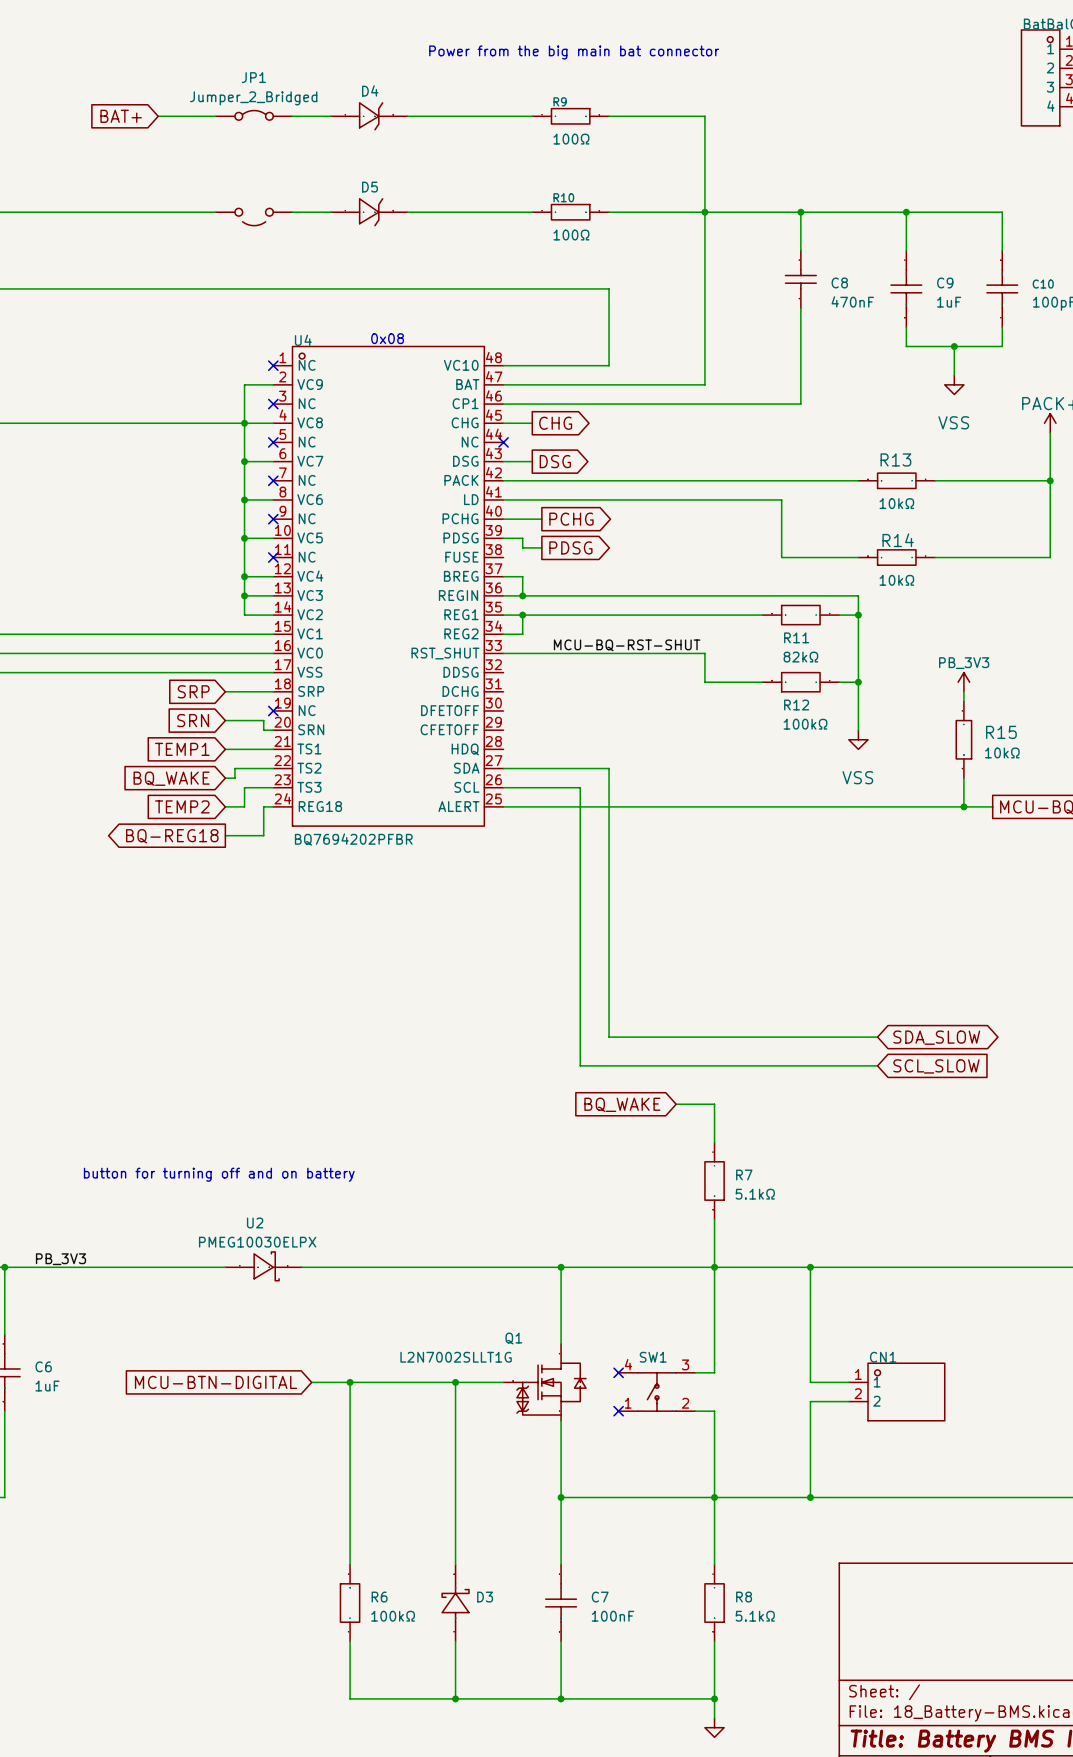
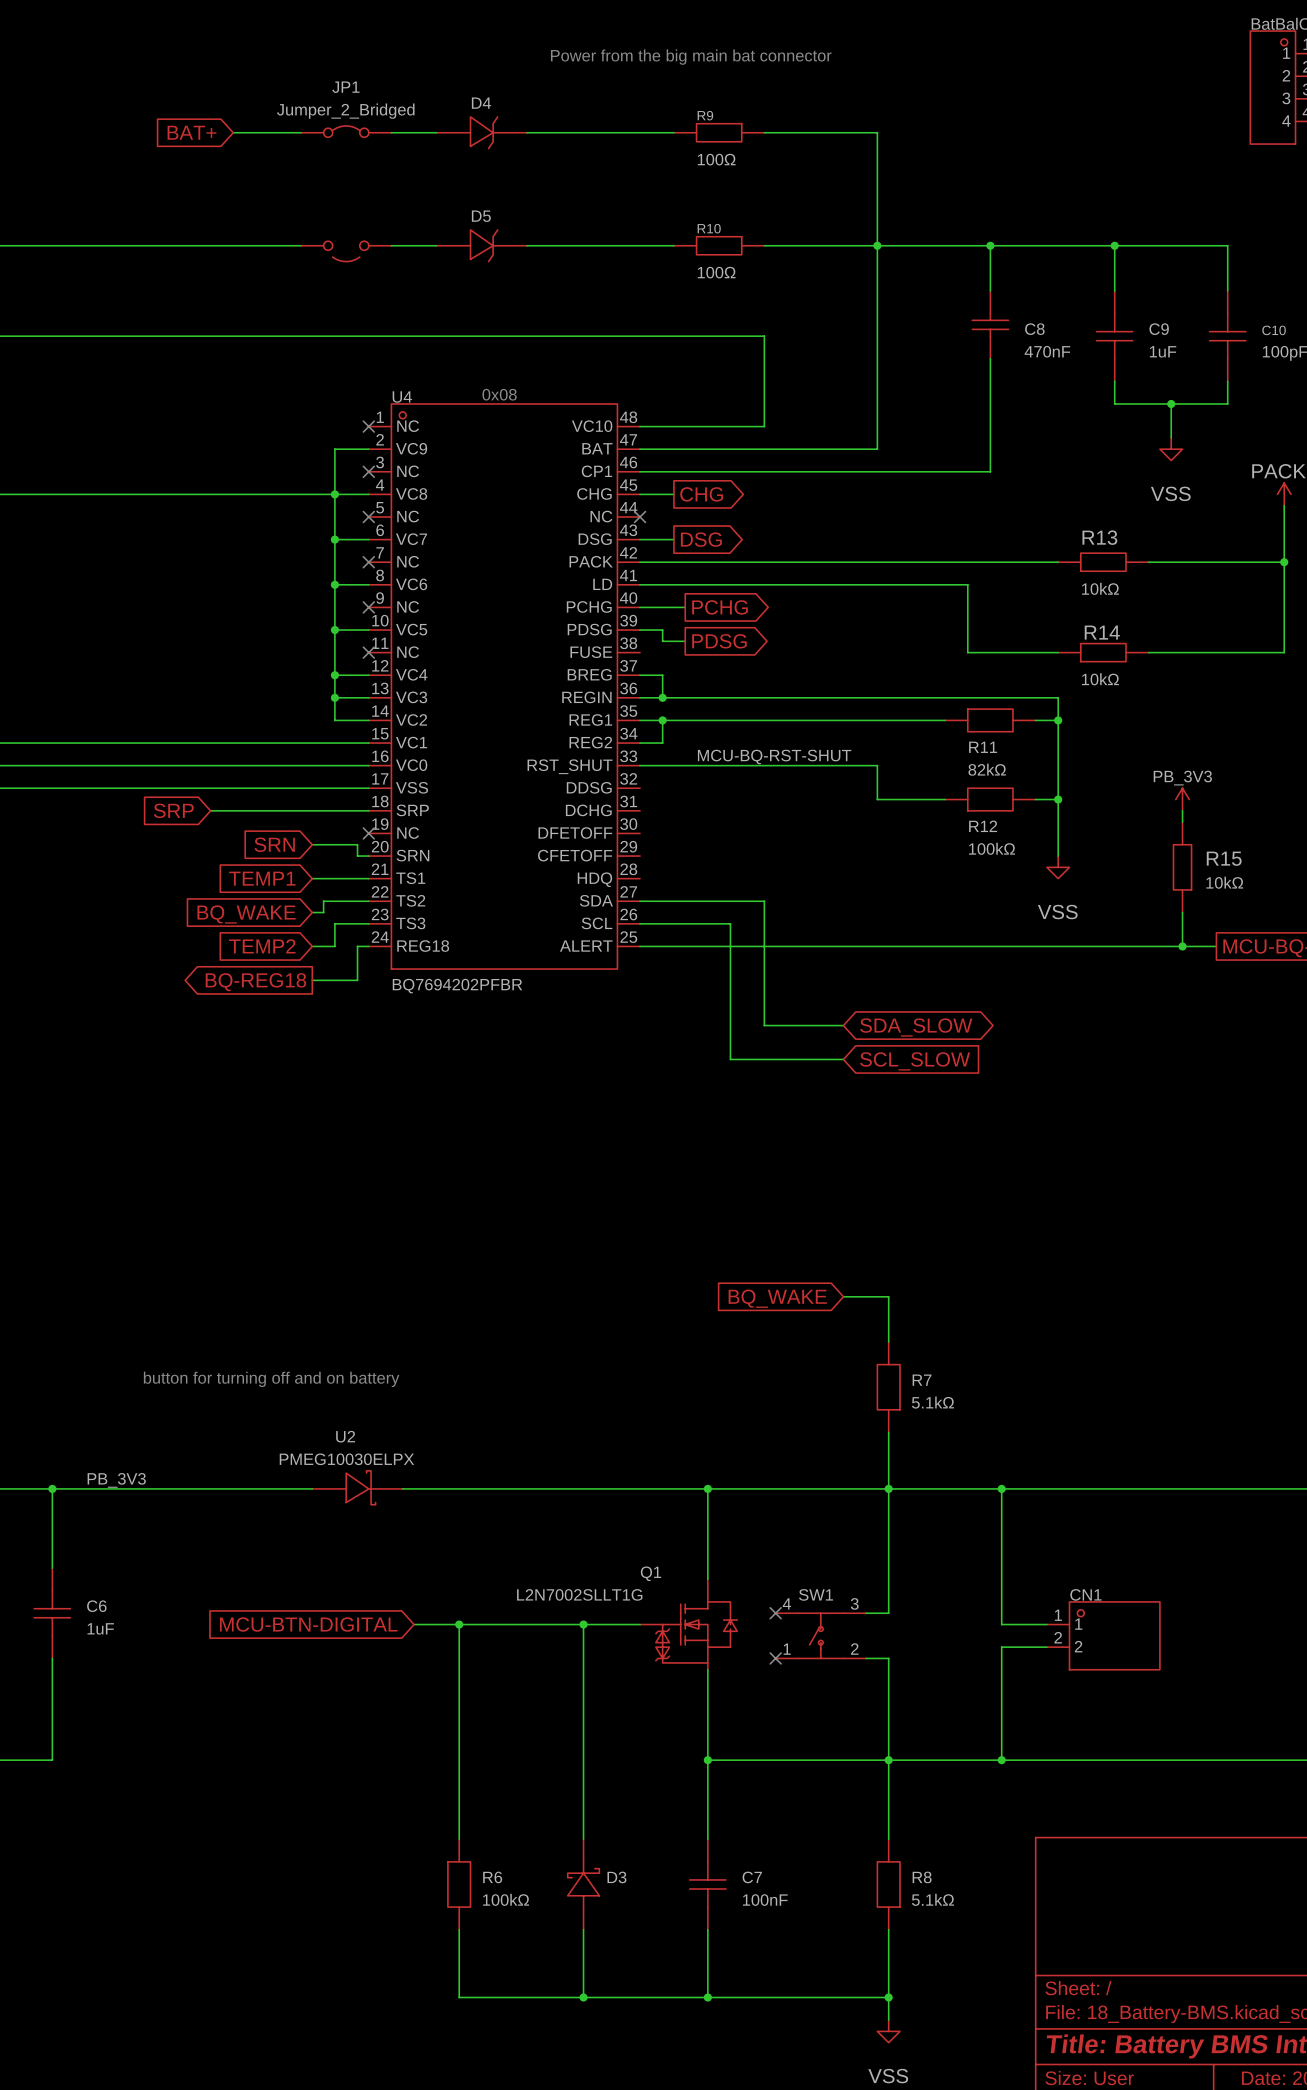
wire: none -> (210, 810) (312, 810)
global label position: SRP (193, 691) -> SRP (173, 810)
wire: (609, 874) (609, 1037) (877, 1037) -> (764, 1025) (843, 1025)
global label: none -> SDA_SLOW (916, 1027)
wire: (580, 902) (580, 1065) (877, 1065) -> (730, 1059) (843, 1059)
global label: none -> SCL_SLOW (915, 1061)
global label: SDA_SLOW (936, 1037) -> none
global label: SCL_SLOW (936, 1066) -> none

